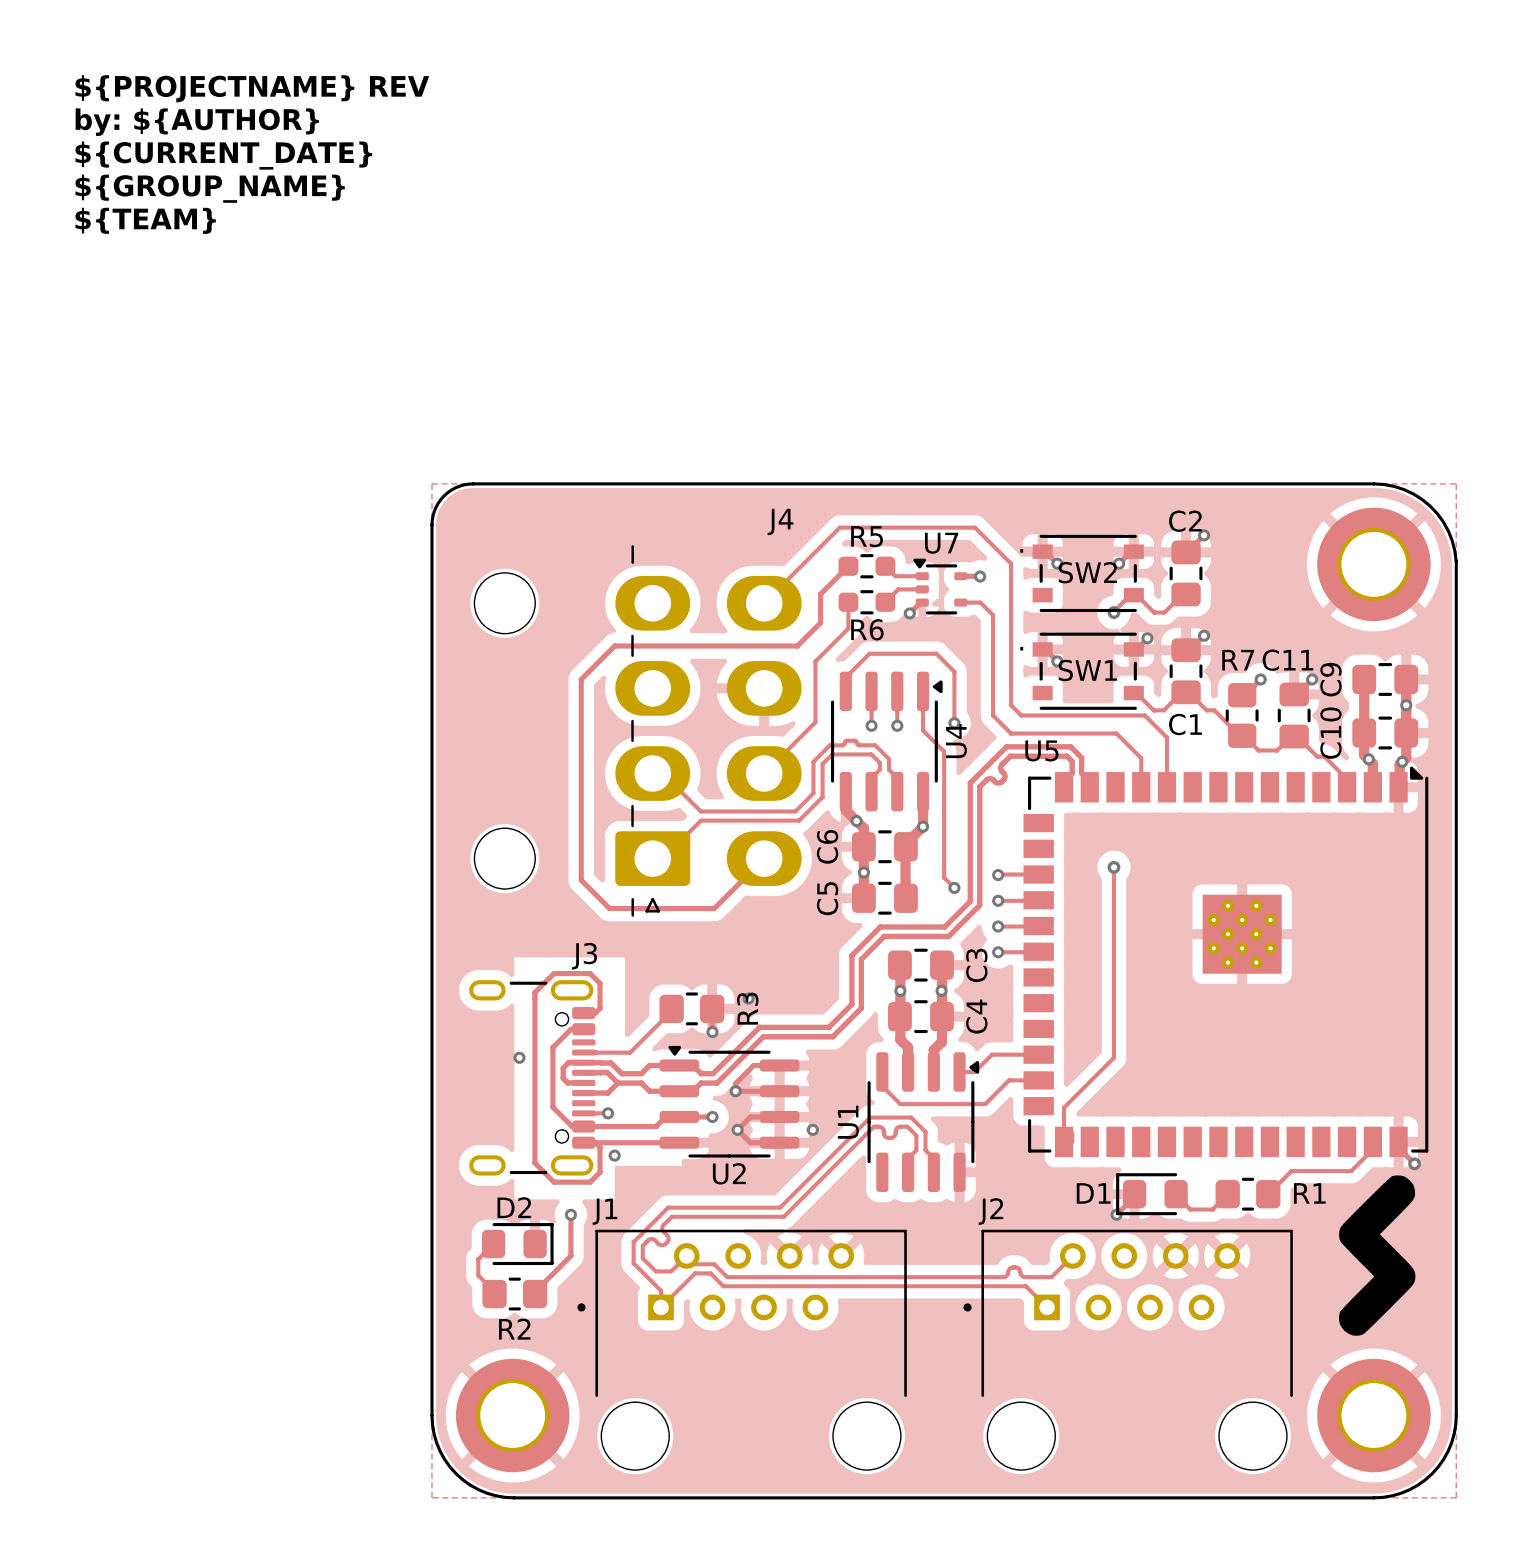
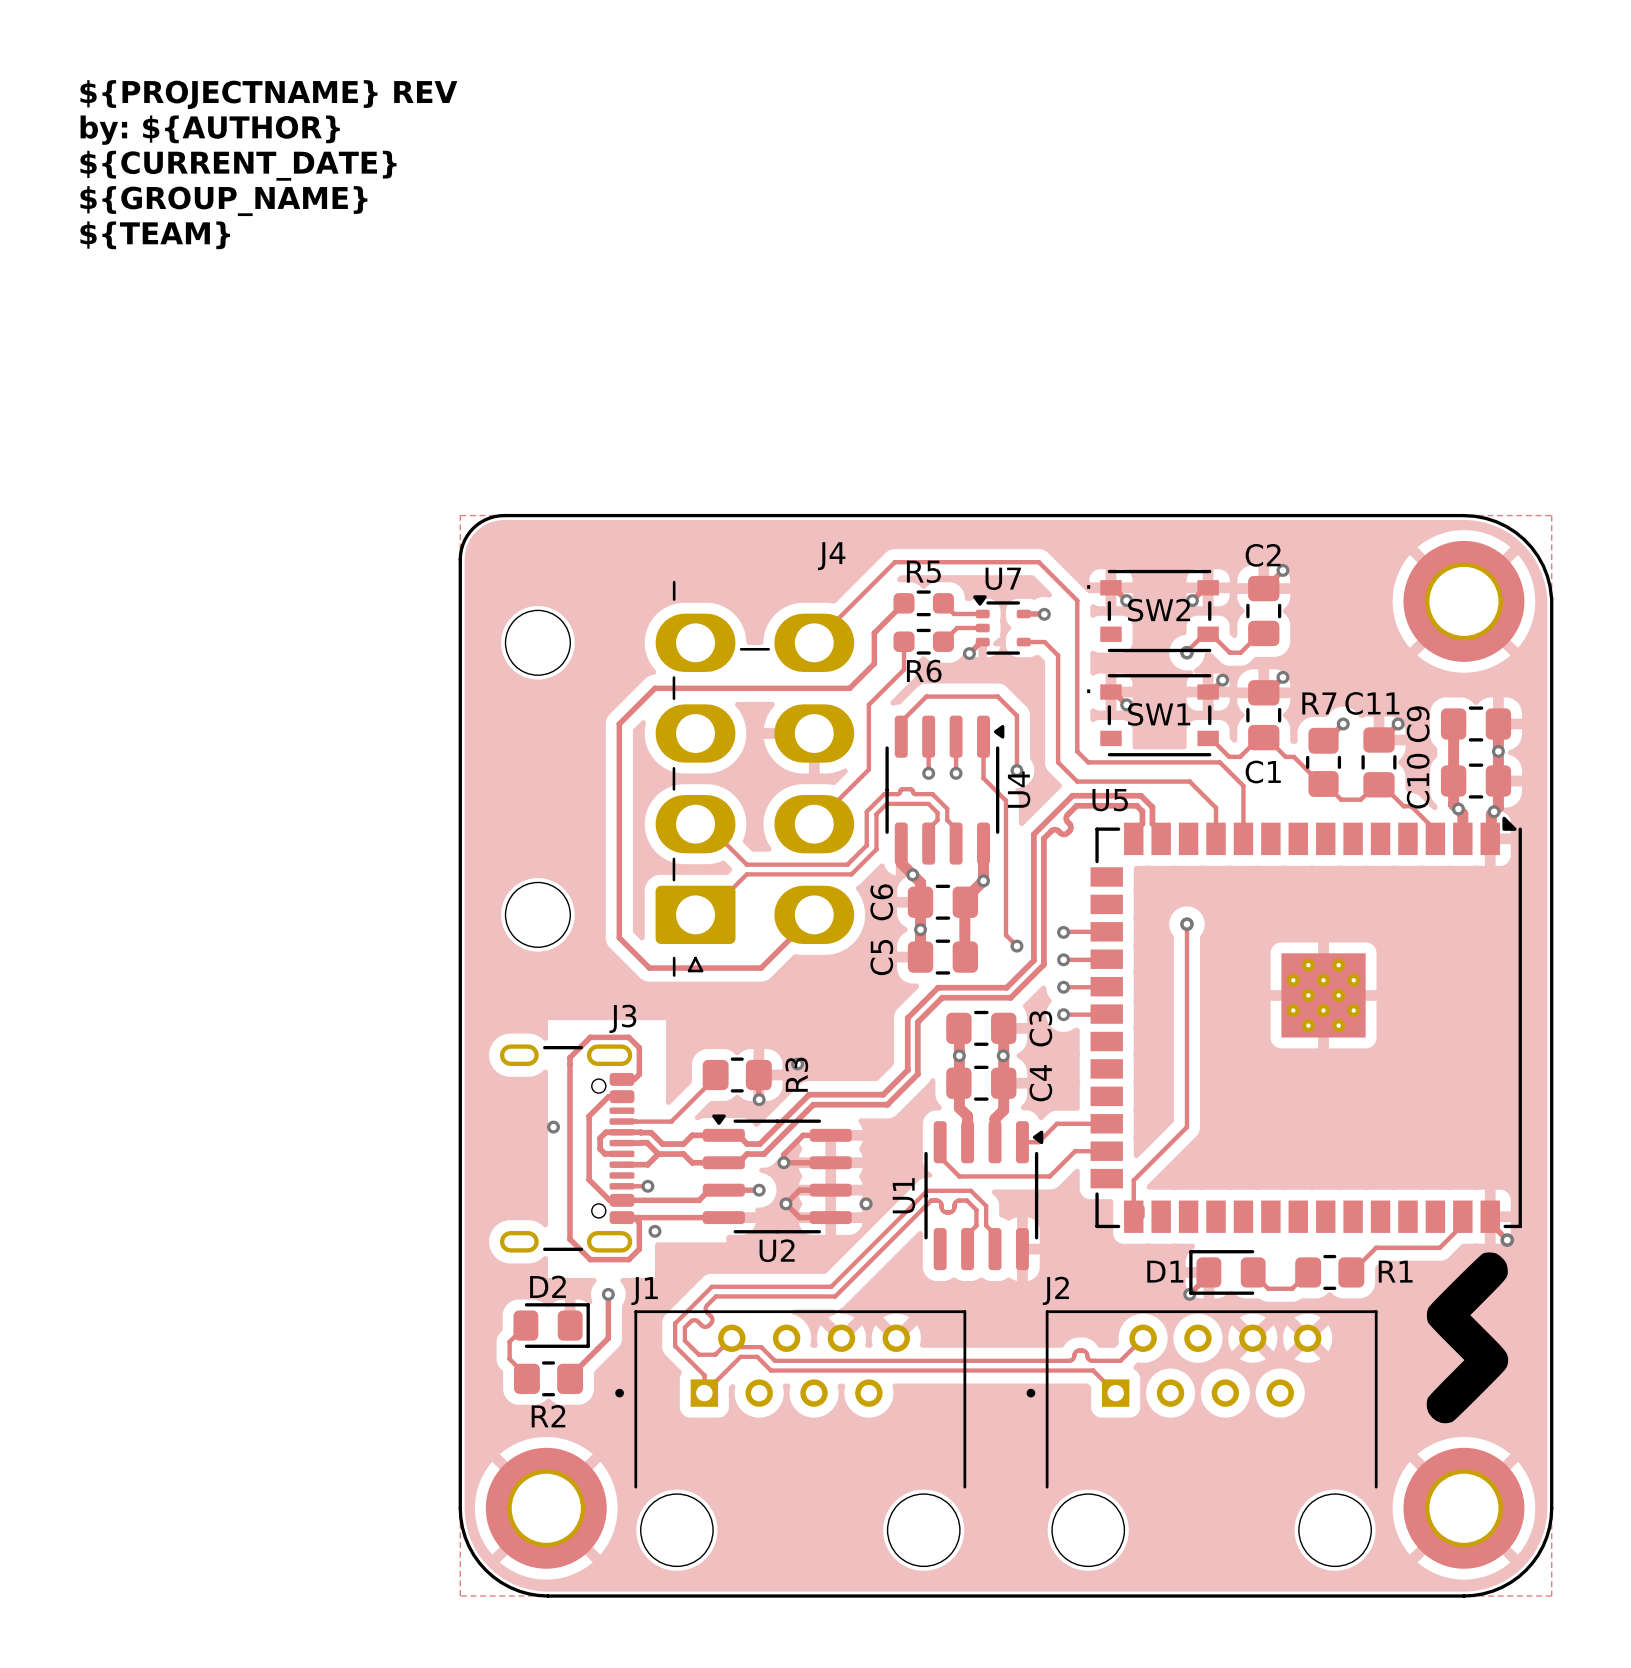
J4 footprint: [474, 545, 802, 917] -> [505, 580, 855, 977]

